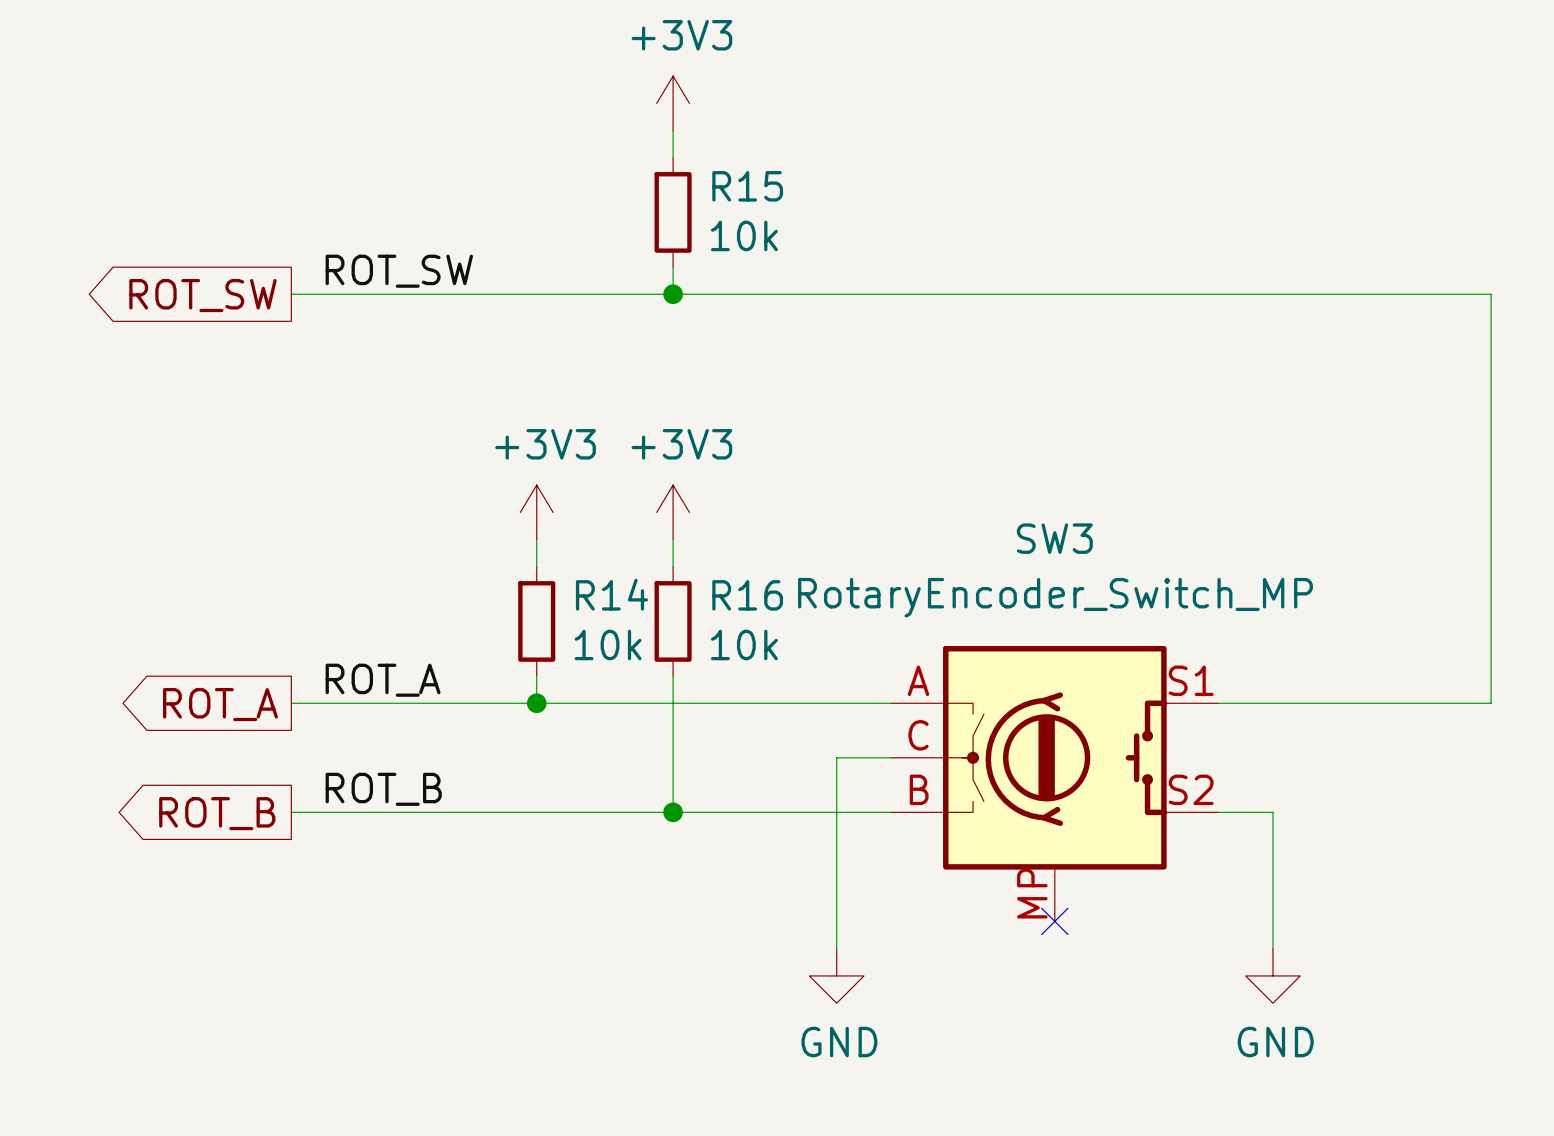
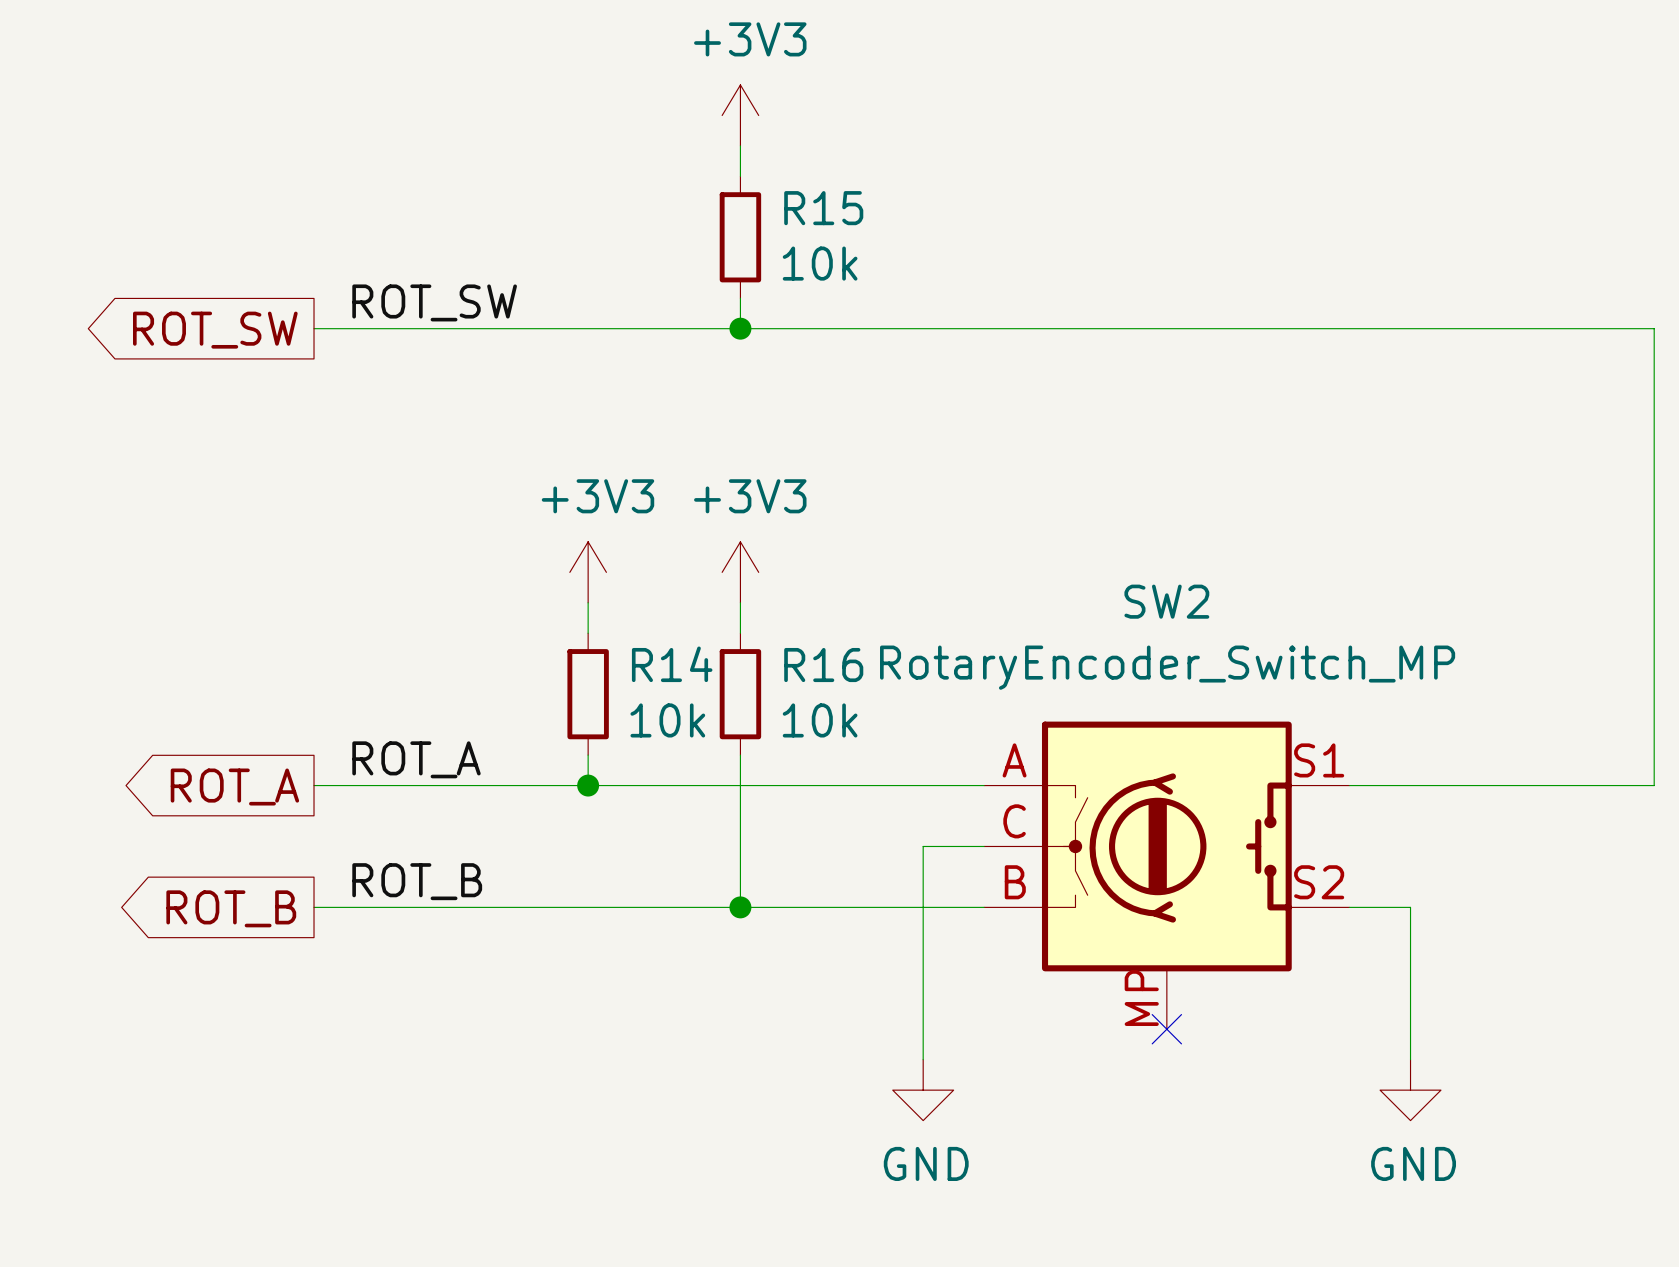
SW3 name: SW3 (1054, 538) -> SW2 (1166, 601)

